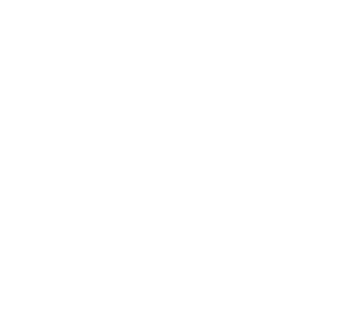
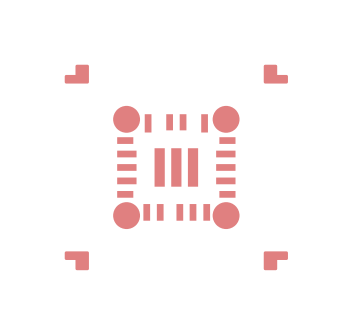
part: none -> (176, 167)

